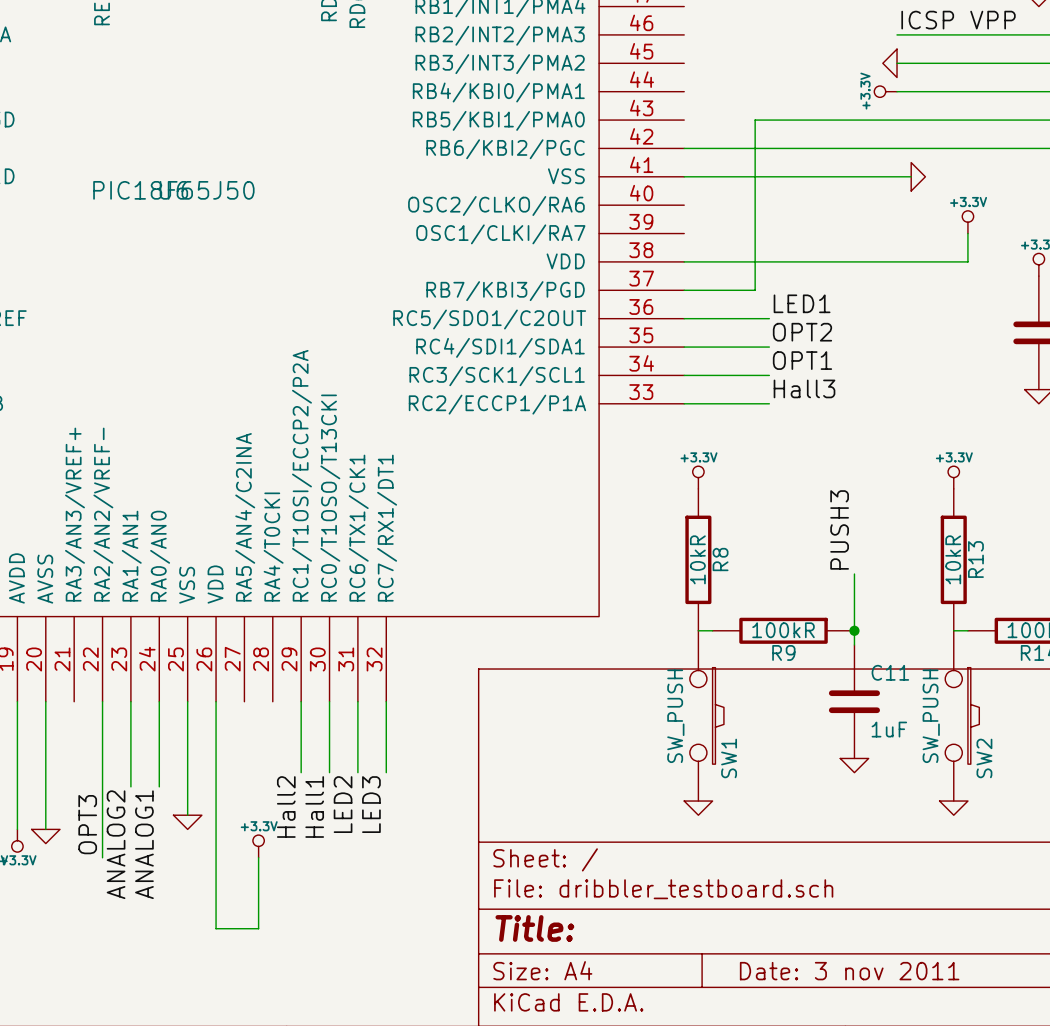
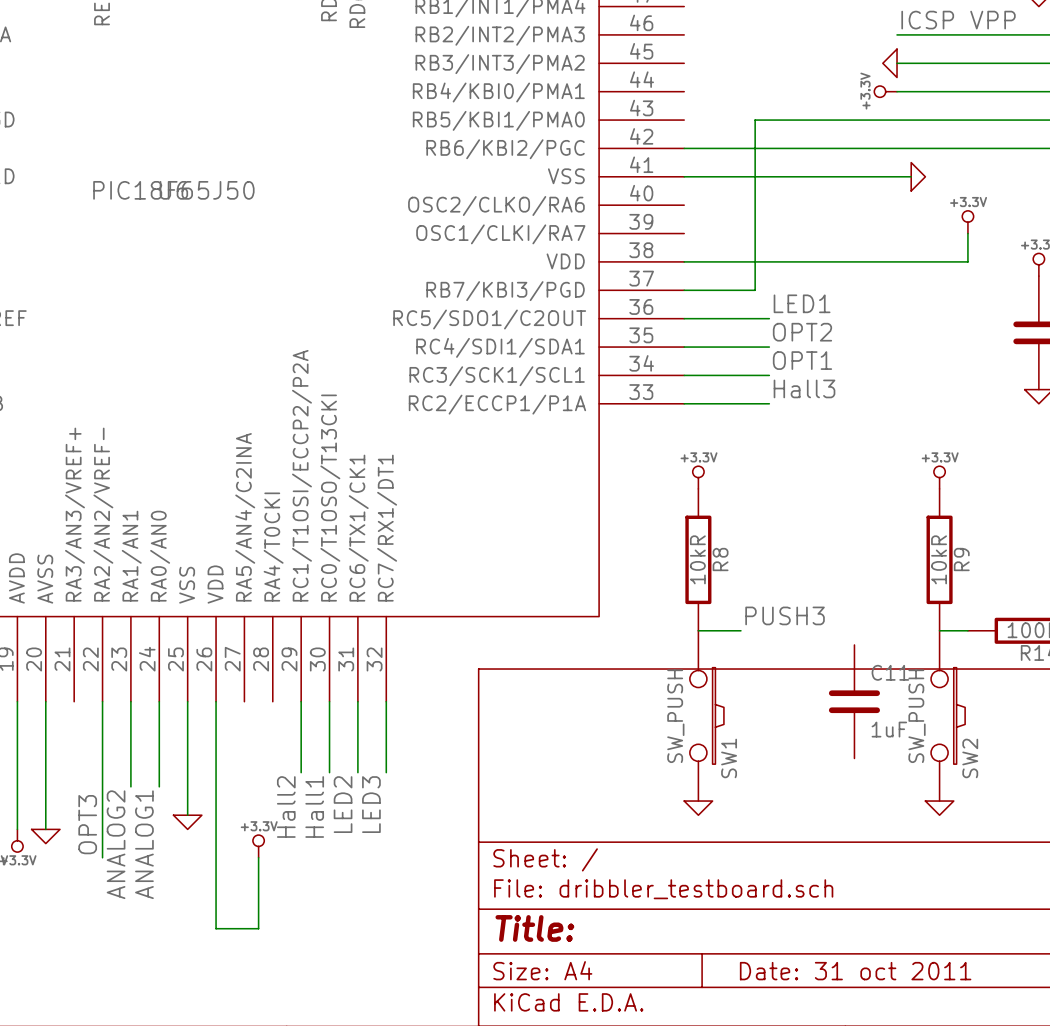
power symbol position: +3.3V (953, 477) -> +3.3V (939, 477)
label rotation: 0° (839, 529) -> 90° clockwise (785, 615)
label position: PUSH3 (839, 529) -> PUSH3 (785, 615)
R13: 10kR (953, 559) -> none
wire: (854, 574) (854, 644) -> none
R9 rotation: 0° (783, 630) -> 90° clockwise (939, 559)
R9 position: (783, 630) -> (939, 559)
R9 value: 100kR (783, 630) -> 10kR (939, 559)
junction: (854, 630) -> none
wire: none -> (939, 630) (953, 630)
R9 name position: R9 (783, 652) -> R9 (961, 559)
SW2 position: (962, 715) -> (948, 715)
power symbol: (854, 765) -> none
power symbol position: (953, 808) -> (939, 808)
title block: Date: 3 nov 2011 (849, 971) -> Date: 31 oct 2011 (855, 971)

